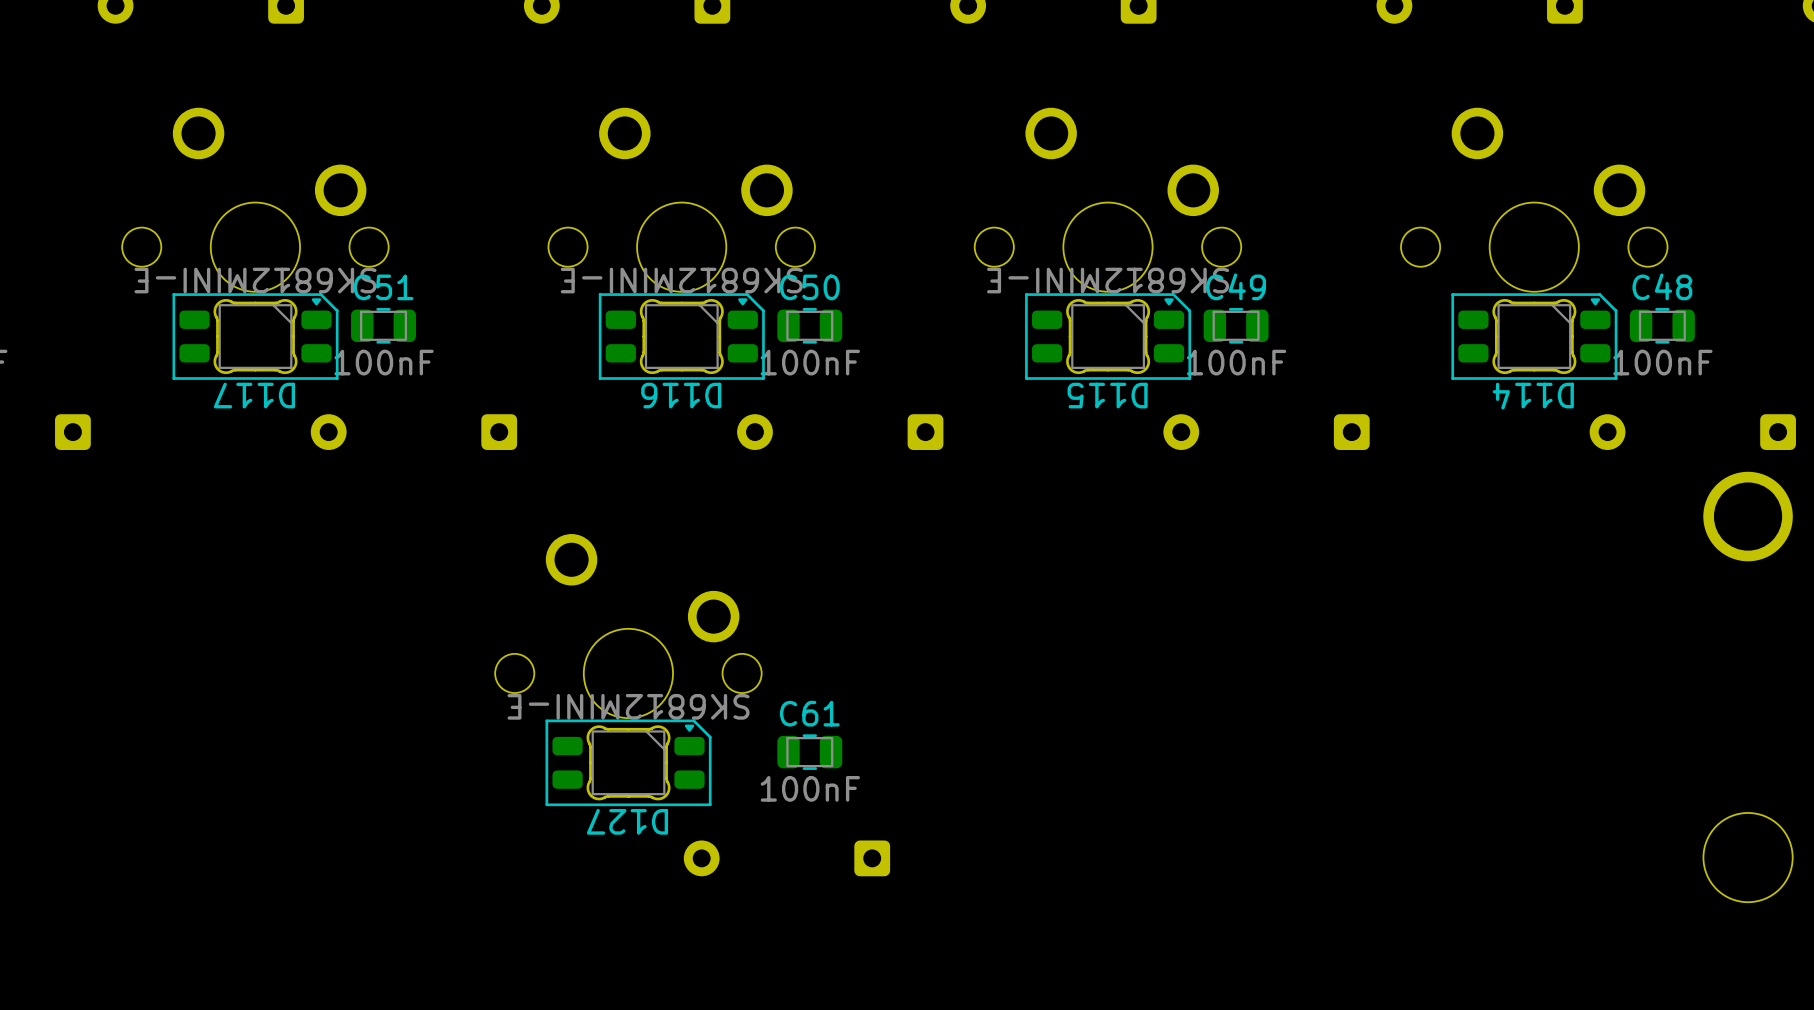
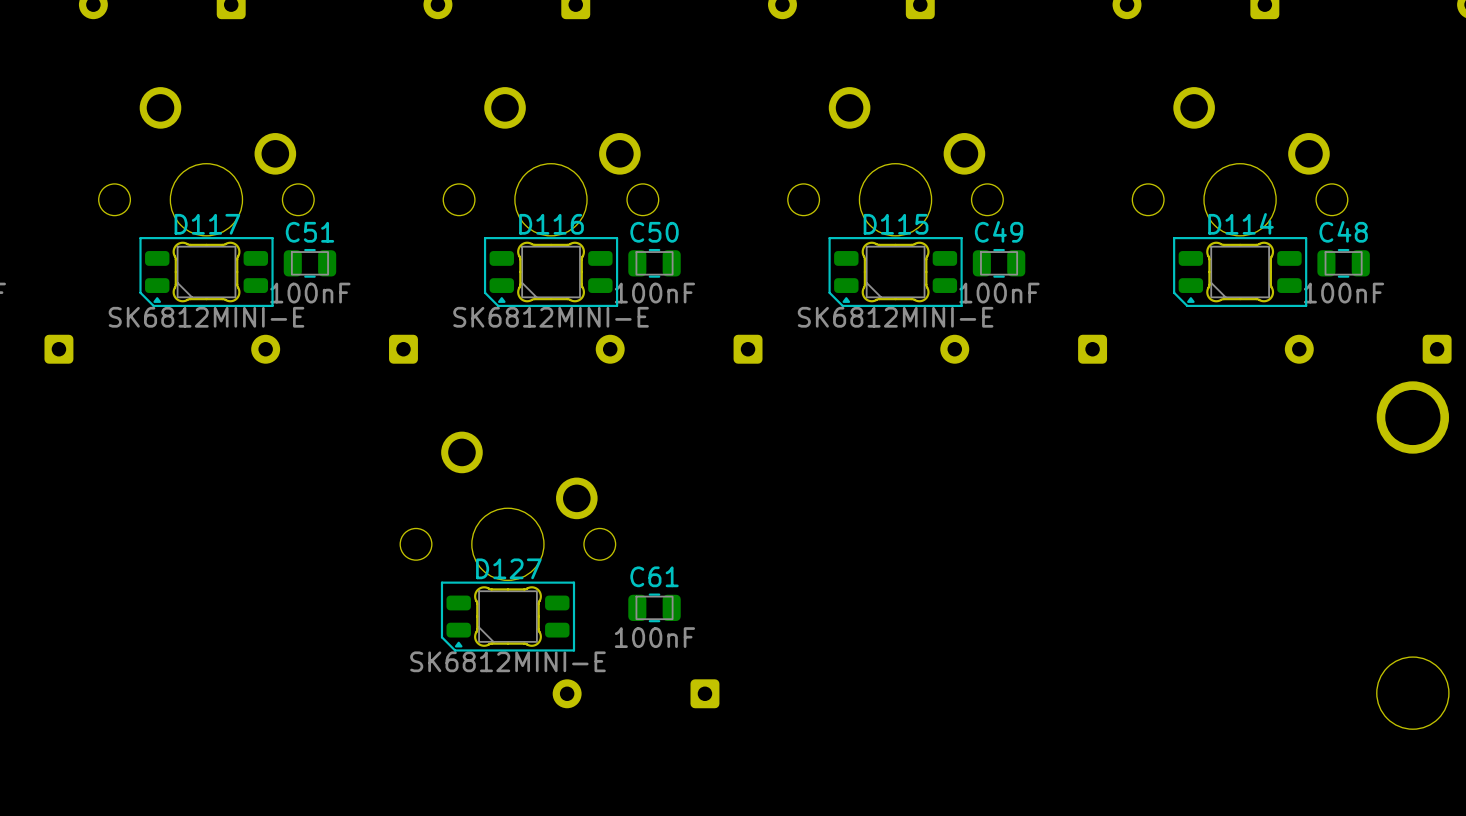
D117 rotation: 0° (255, 336) -> 180° (206, 272)
D116 rotation: 0° (681, 336) -> 180° (551, 272)
D115 rotation: 0° (1108, 336) -> 180° (895, 272)
D114 rotation: 0° (1534, 336) -> 180° (1240, 272)
D127 rotation: 0° (628, 762) -> 180° (507, 616)

